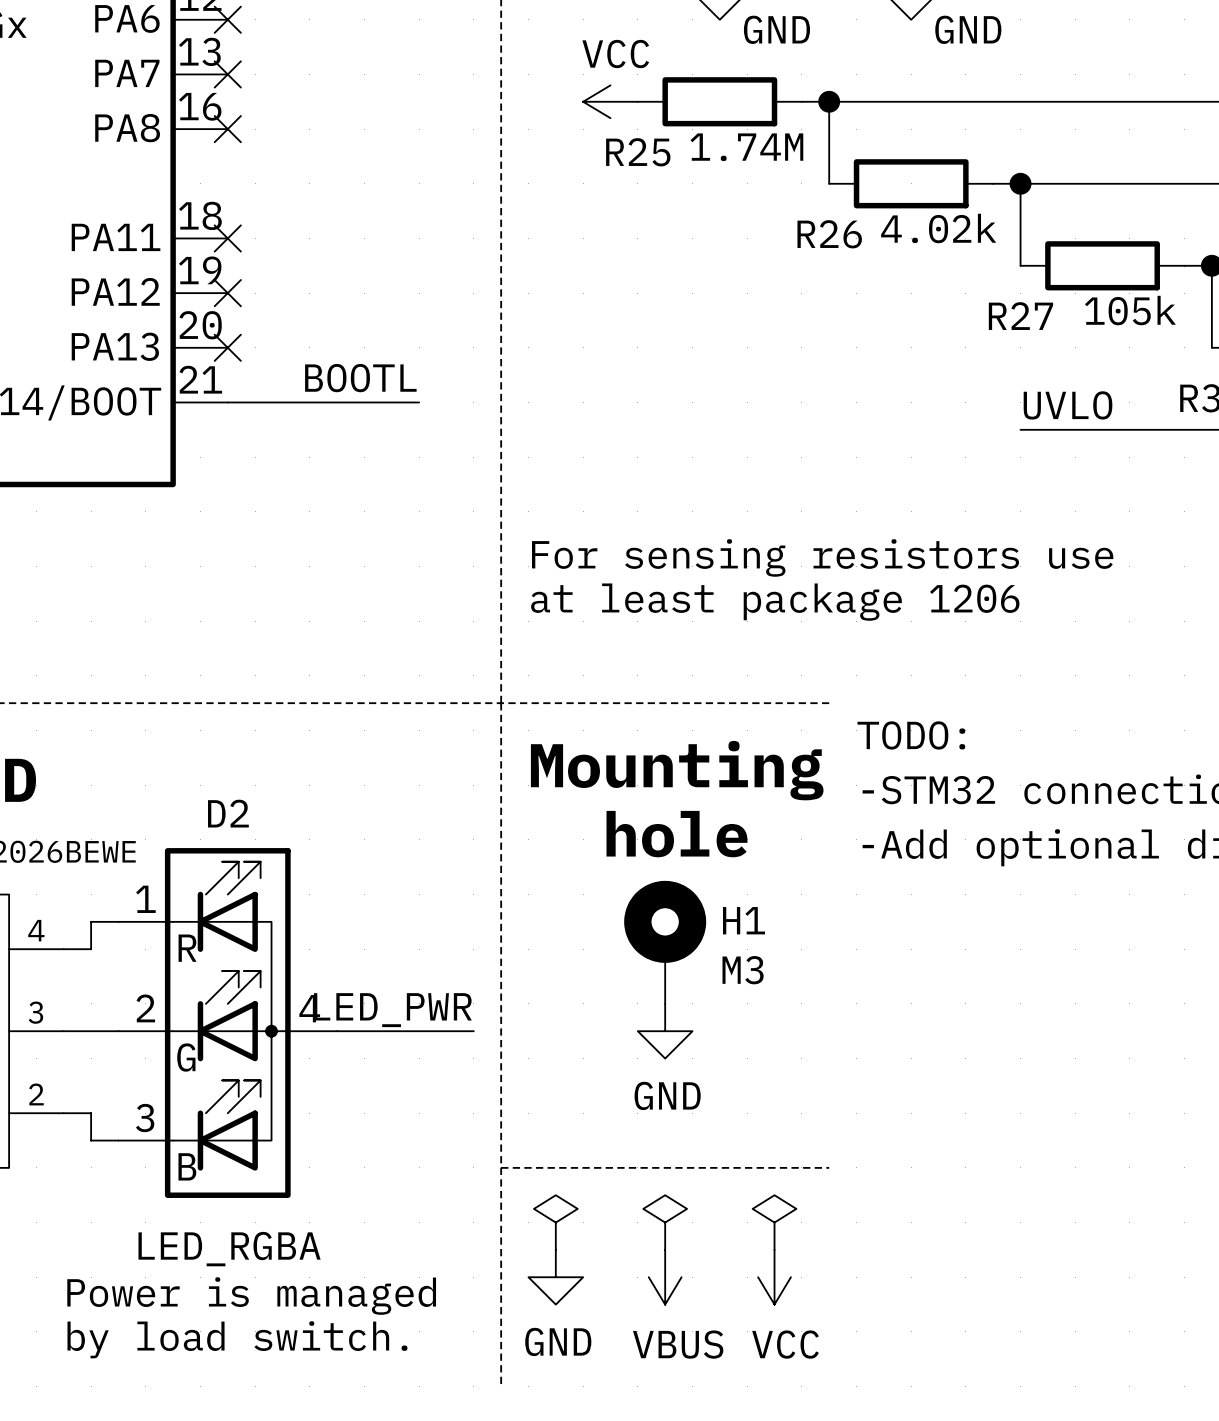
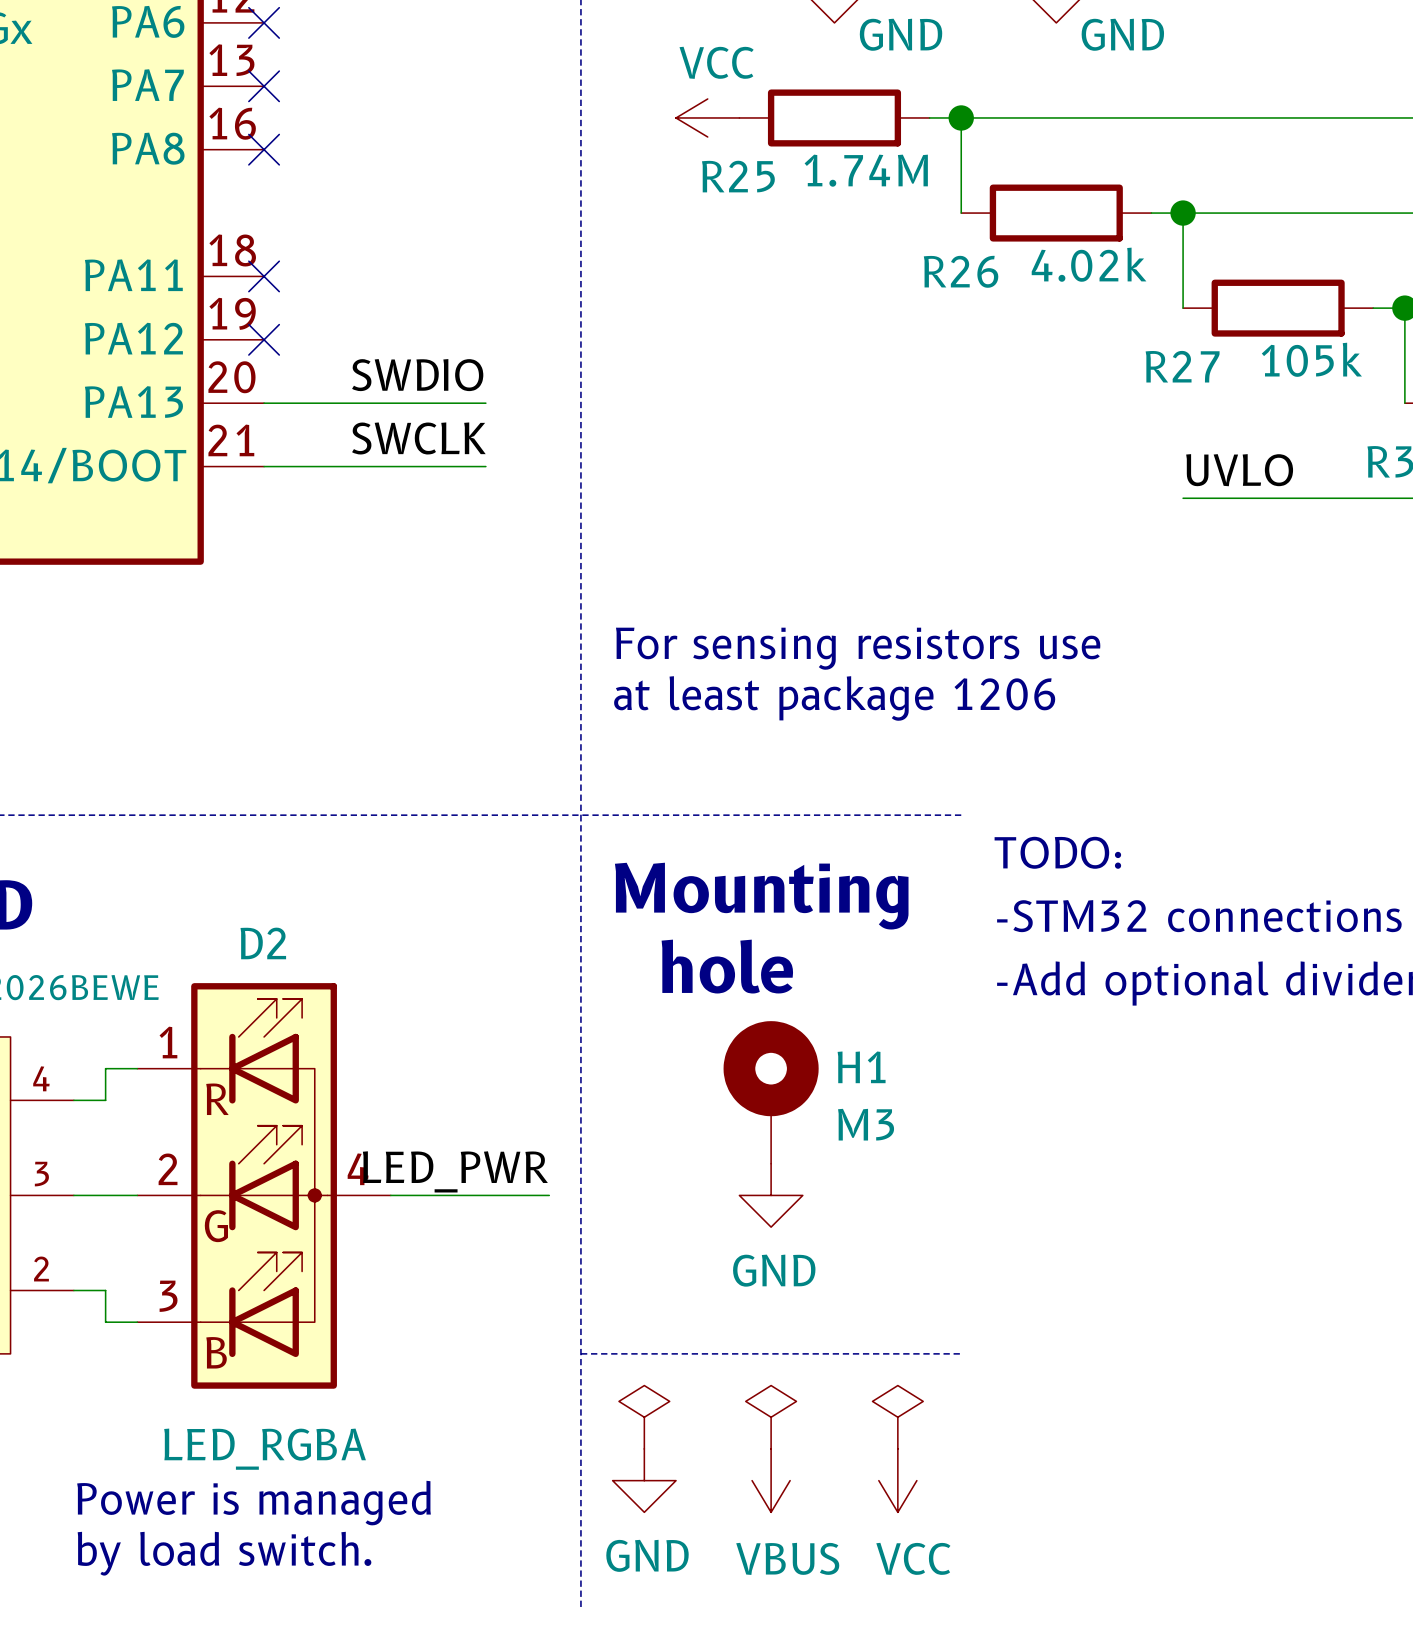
label: none -> SWDIO (417, 375)
wire: none -> (264, 403) (485, 403)
no-connect mark: (227, 347) -> none
label: BOOTL (360, 378) -> SWCLK (418, 438)

